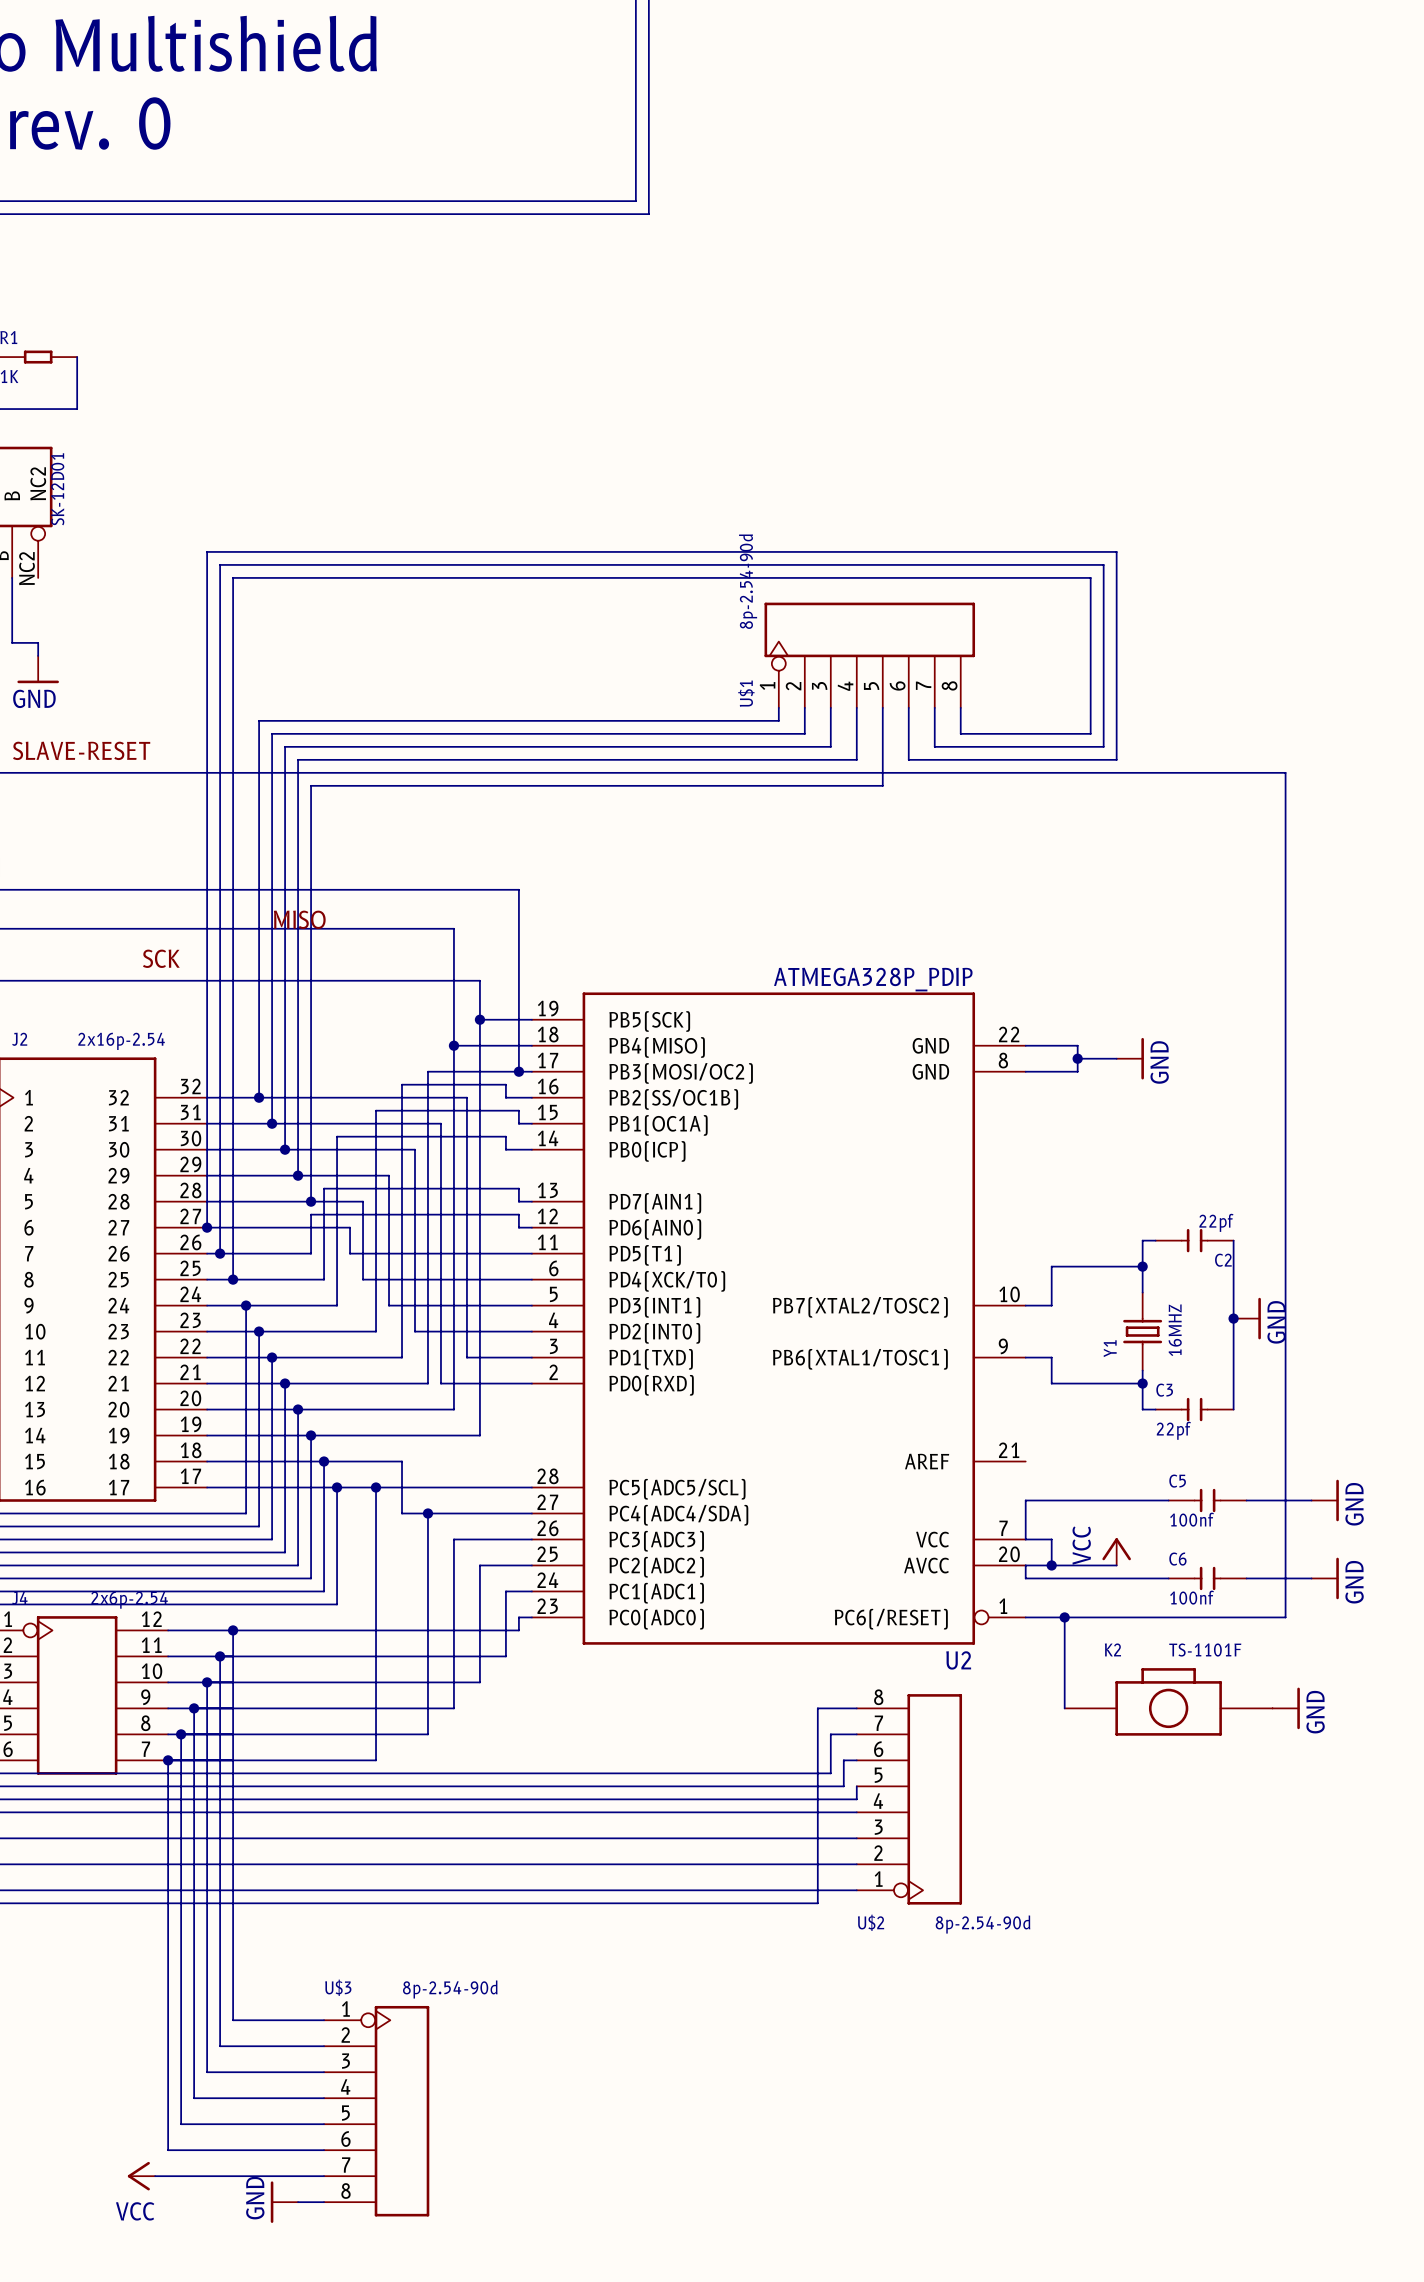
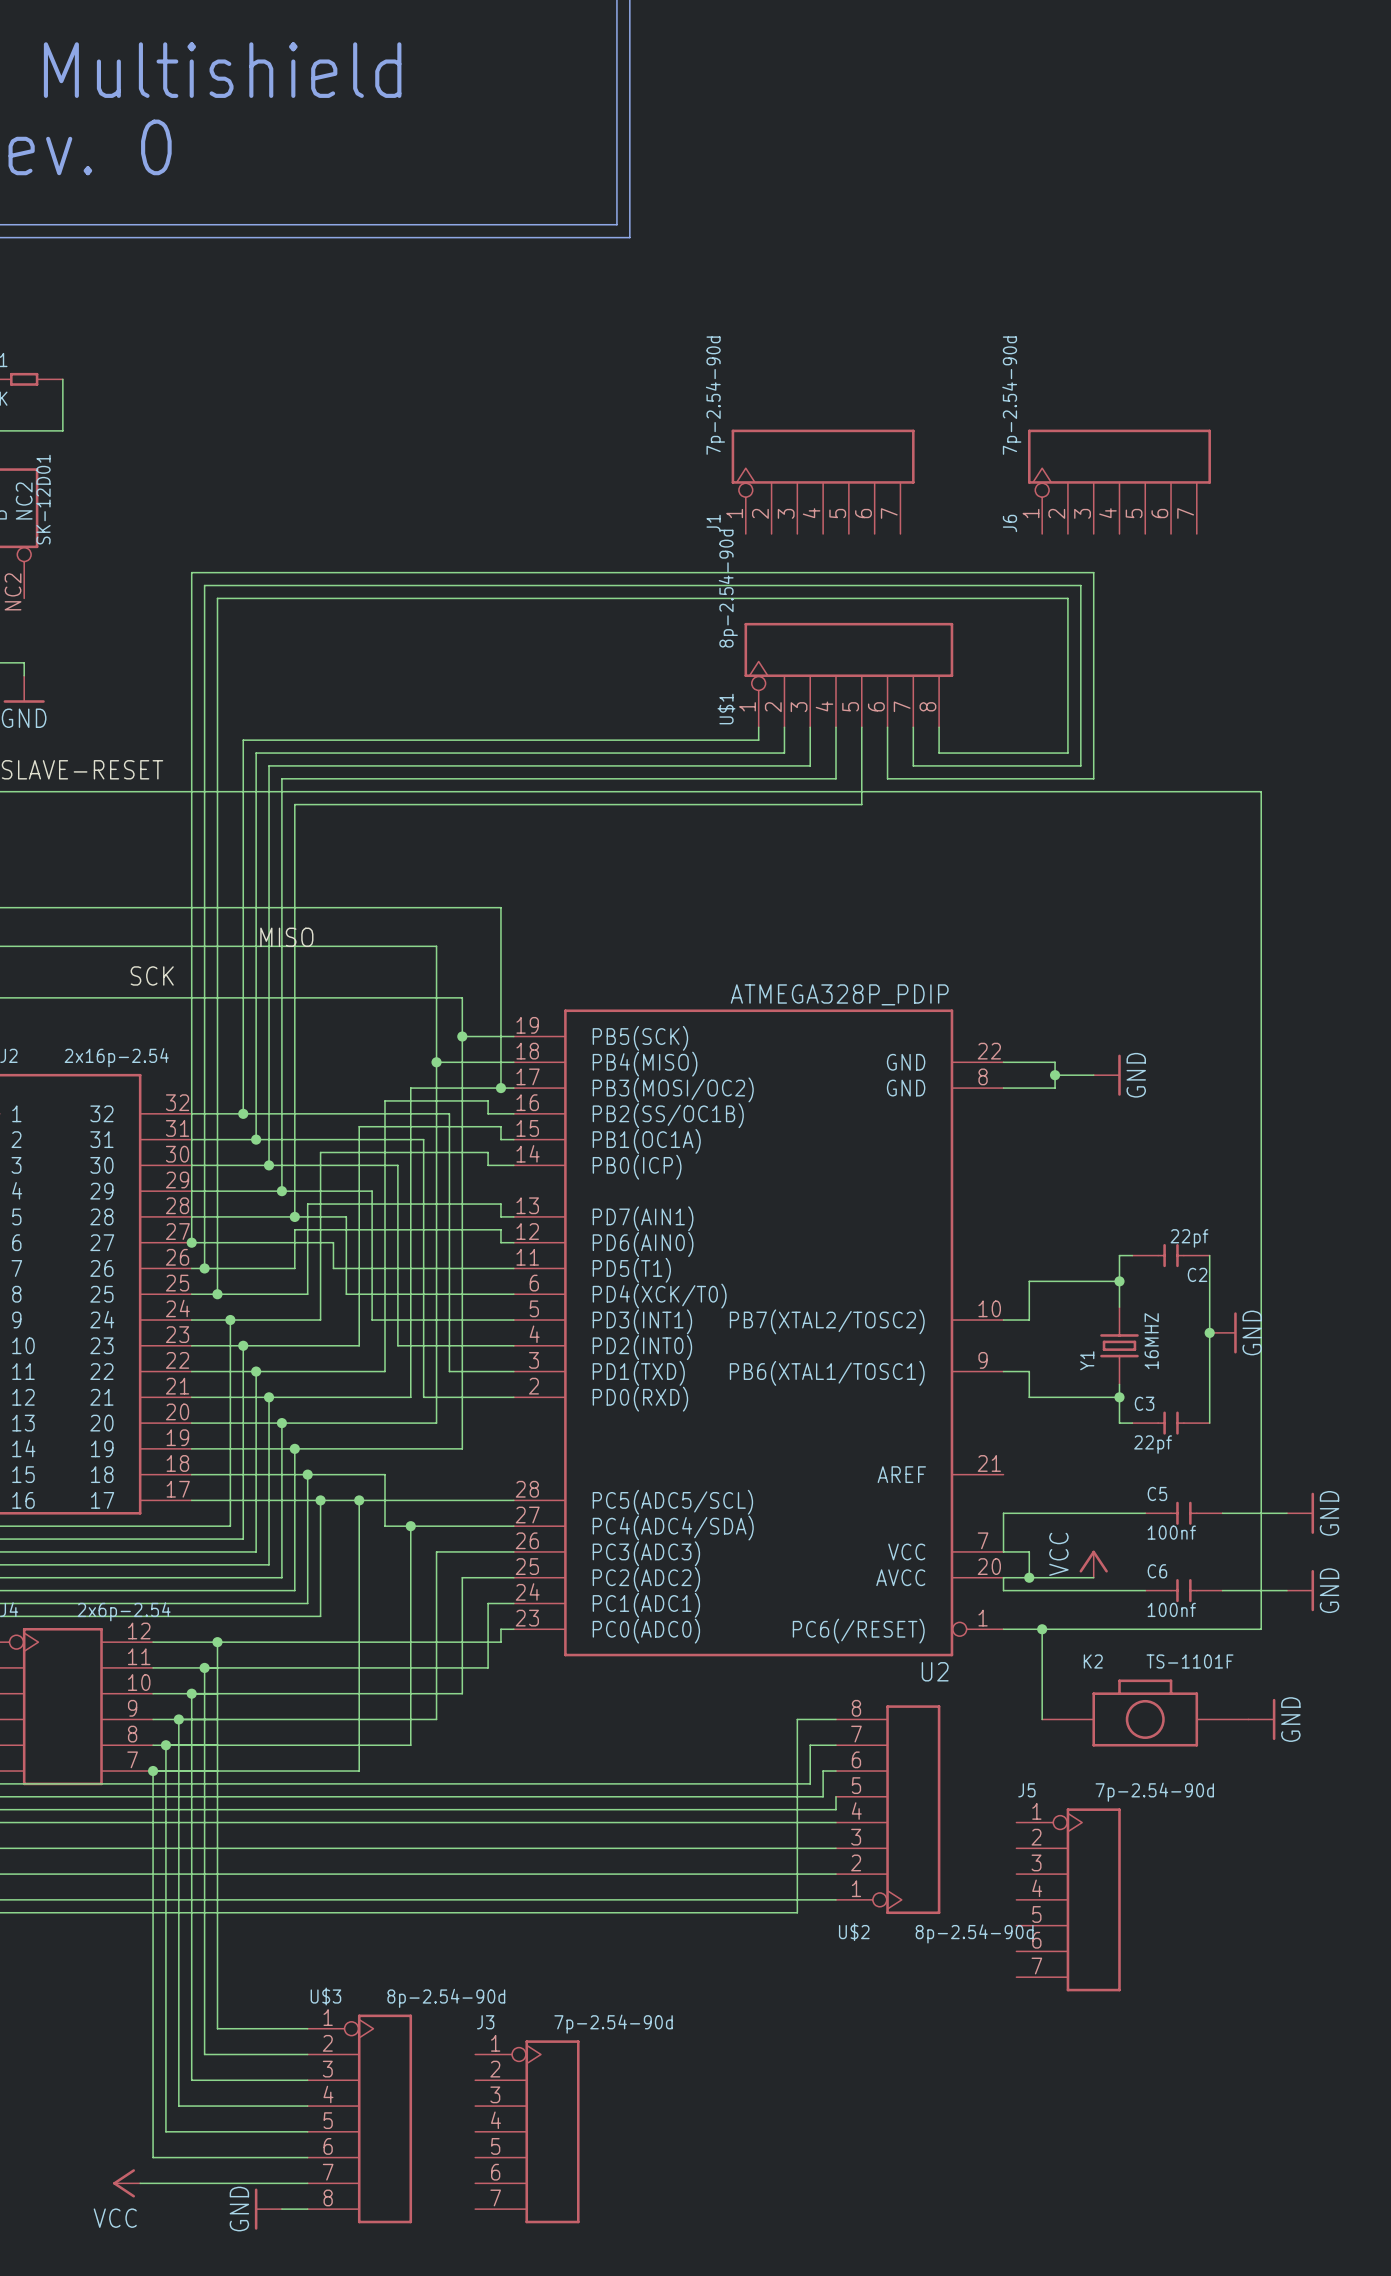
J1: none -> 7p-2.54-90d (823, 481)
J6: none -> 7p-2.54-90d (1119, 481)
J5: none -> 7p-2.54-90d (1068, 1899)
J3: none -> 7p-2.54-90d (527, 2131)

